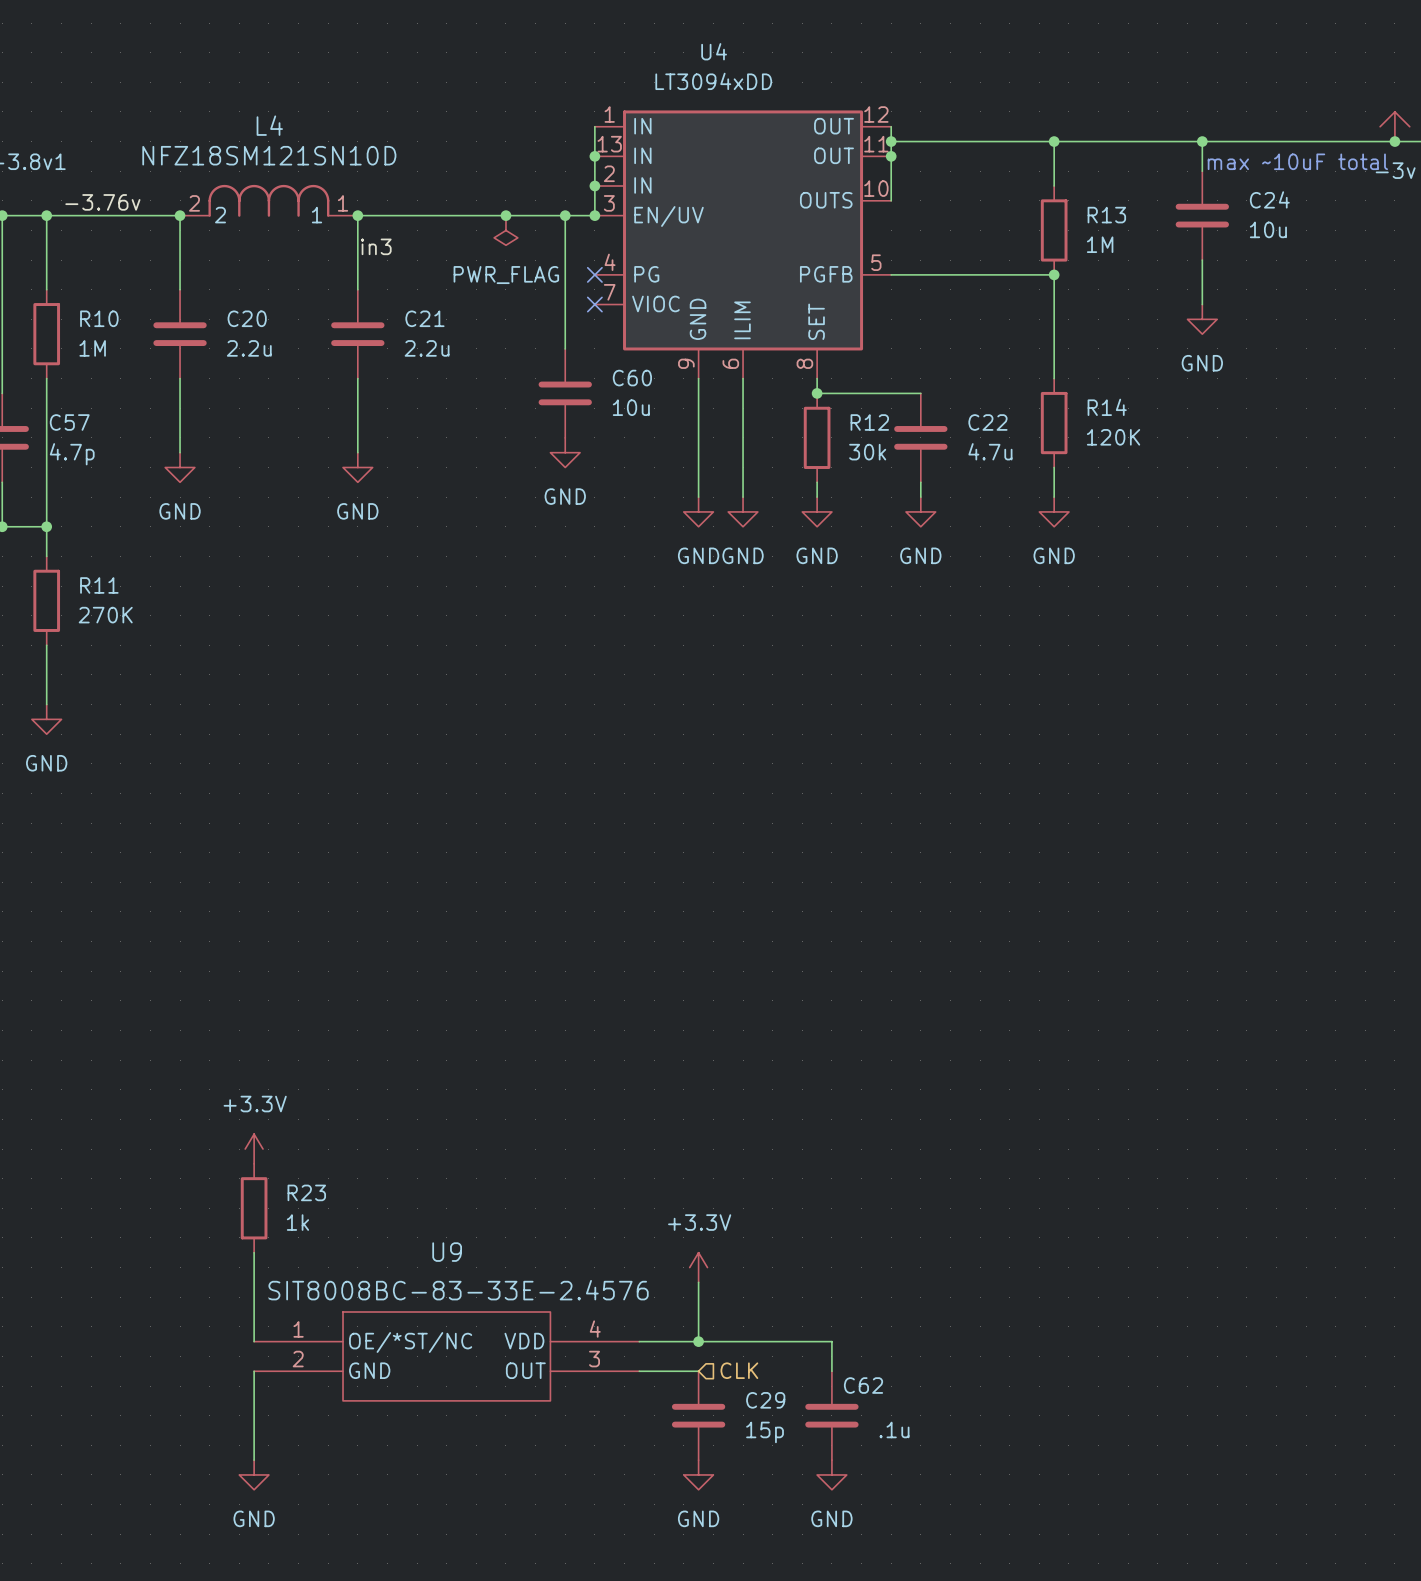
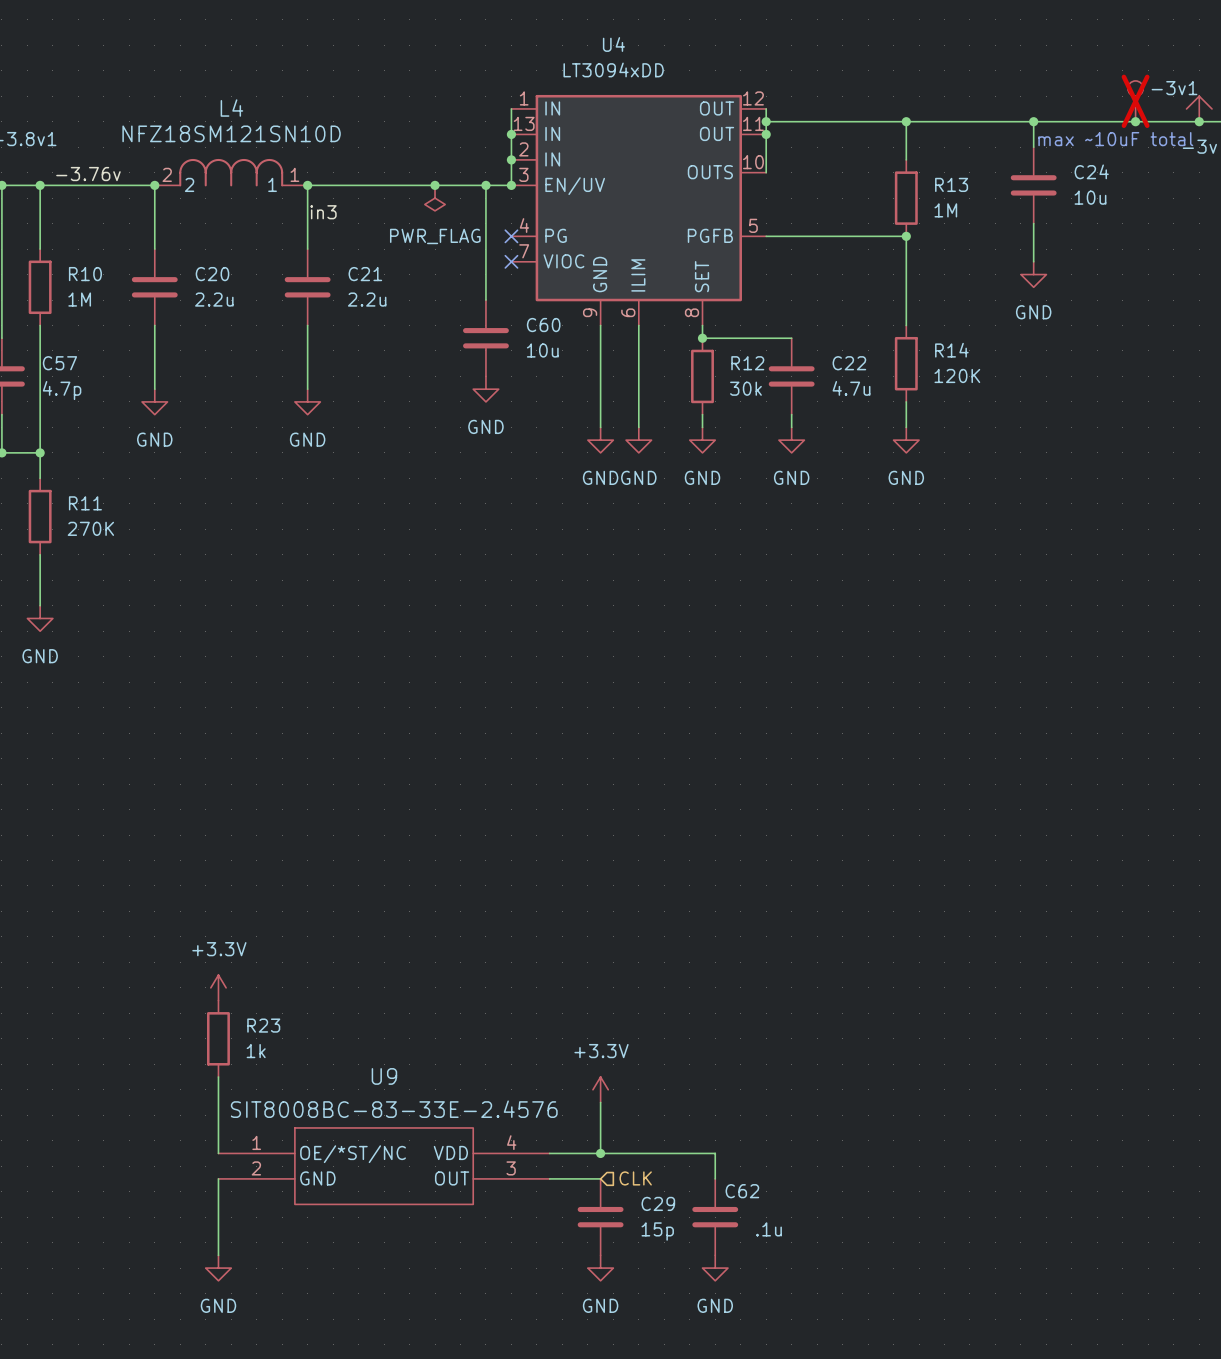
-3v1: none -> (1135, 101)
junction: none -> (1135, 121)

